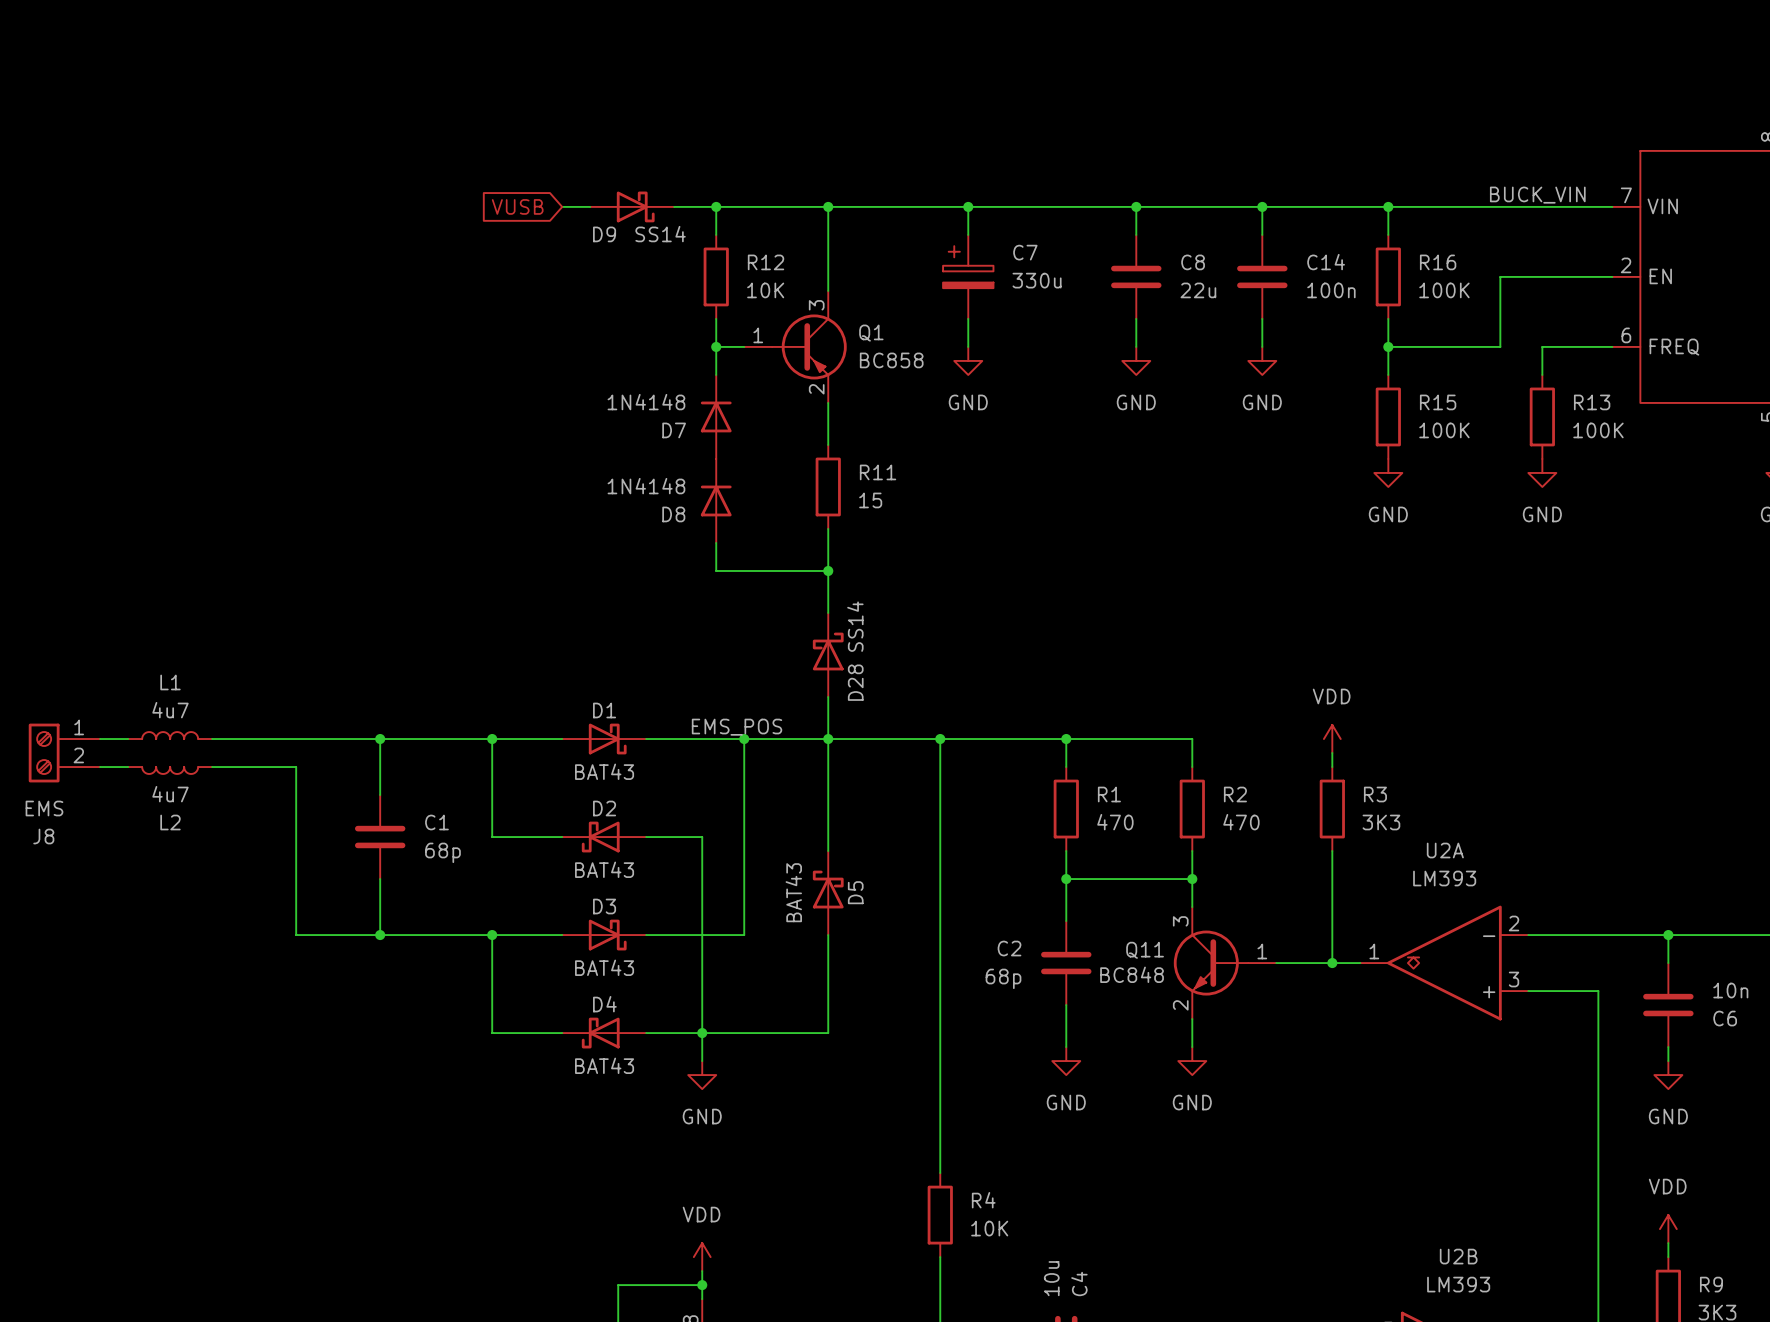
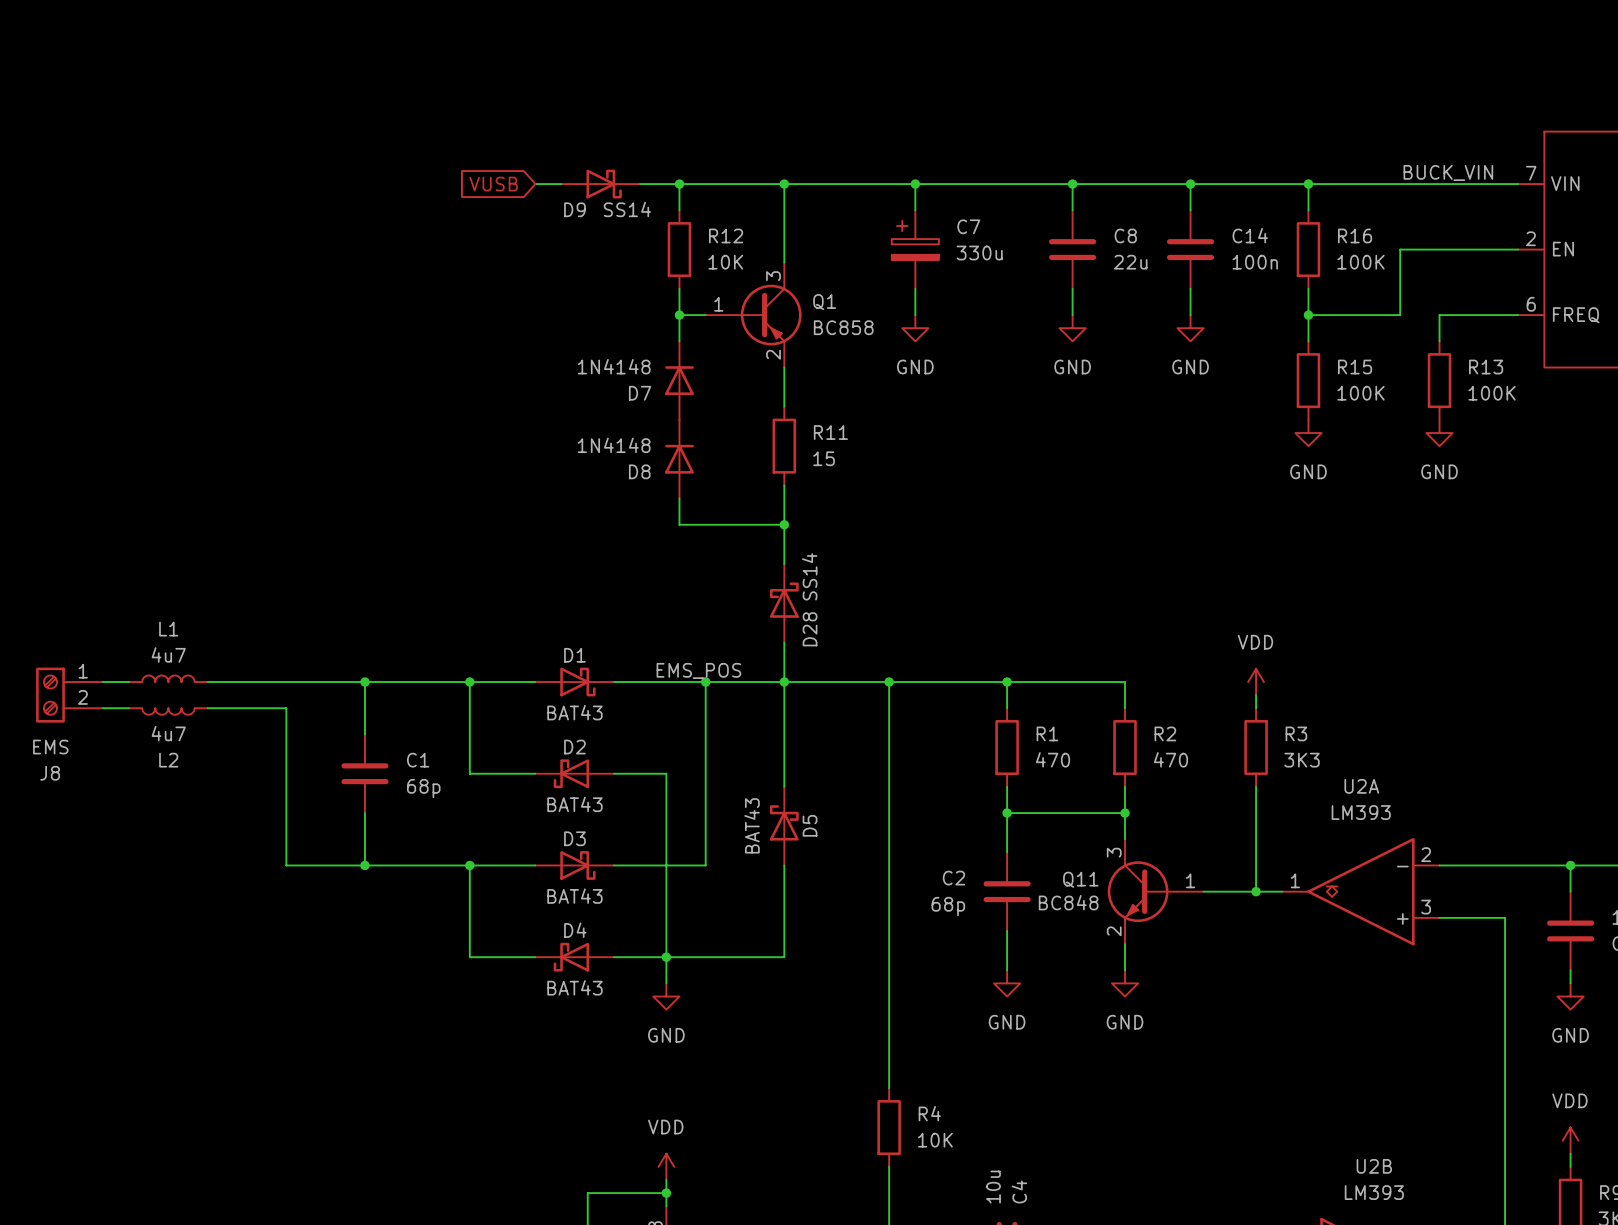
wire: (1500, 276) (1500, 346) (1486, 346) -> (1413, 249) (1400, 249) (1400, 315)
wire: (1542, 346) (1542, 374) -> (1452, 315) (1439, 315) (1439, 341)
R13 position: (1542, 416) -> (1439, 380)
power symbol position: GND (1542, 472) -> GND (1439, 433)

